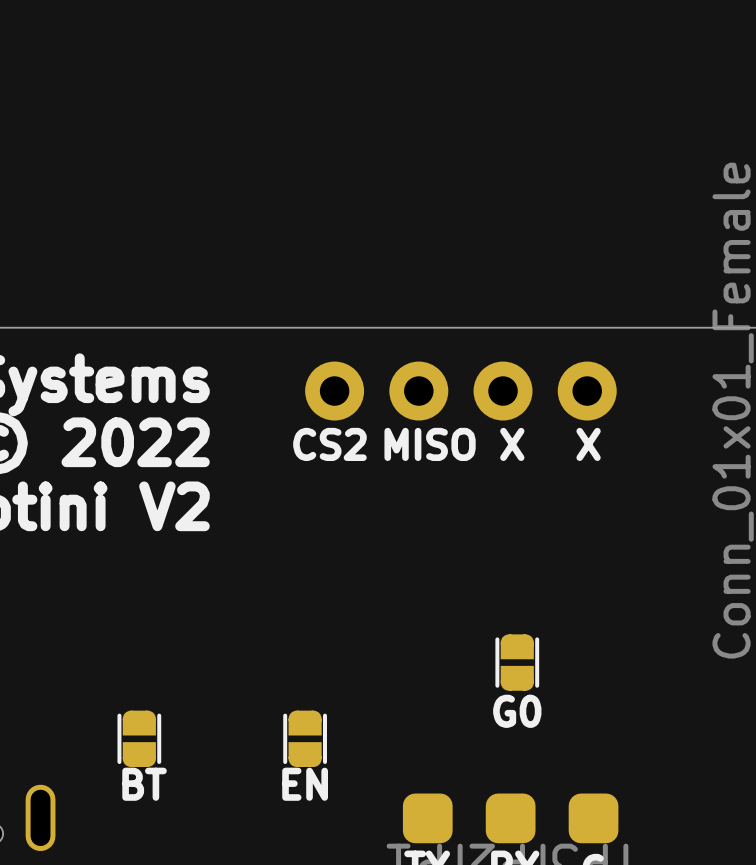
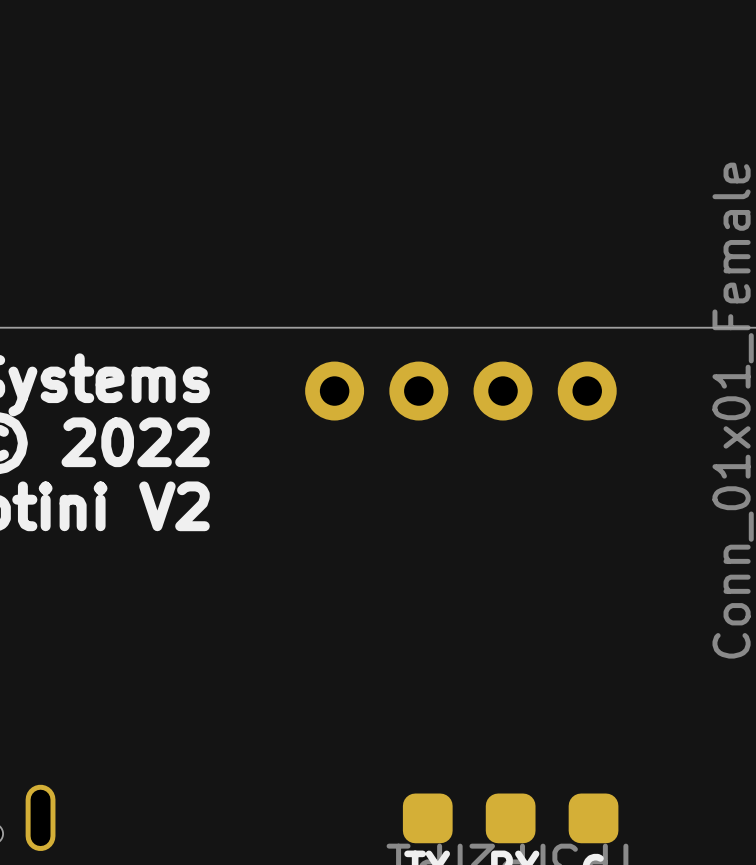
text: CS2 (329, 444) -> none
text: MISO (430, 444) -> none
text: X (512, 444) -> none
text: X (588, 444) -> none
part: (517, 662) -> none
text: G0 (517, 711) -> none
part: (139, 738) -> none
part: (305, 738) -> none
text: BT (144, 784) -> none
text: EN (305, 784) -> none

